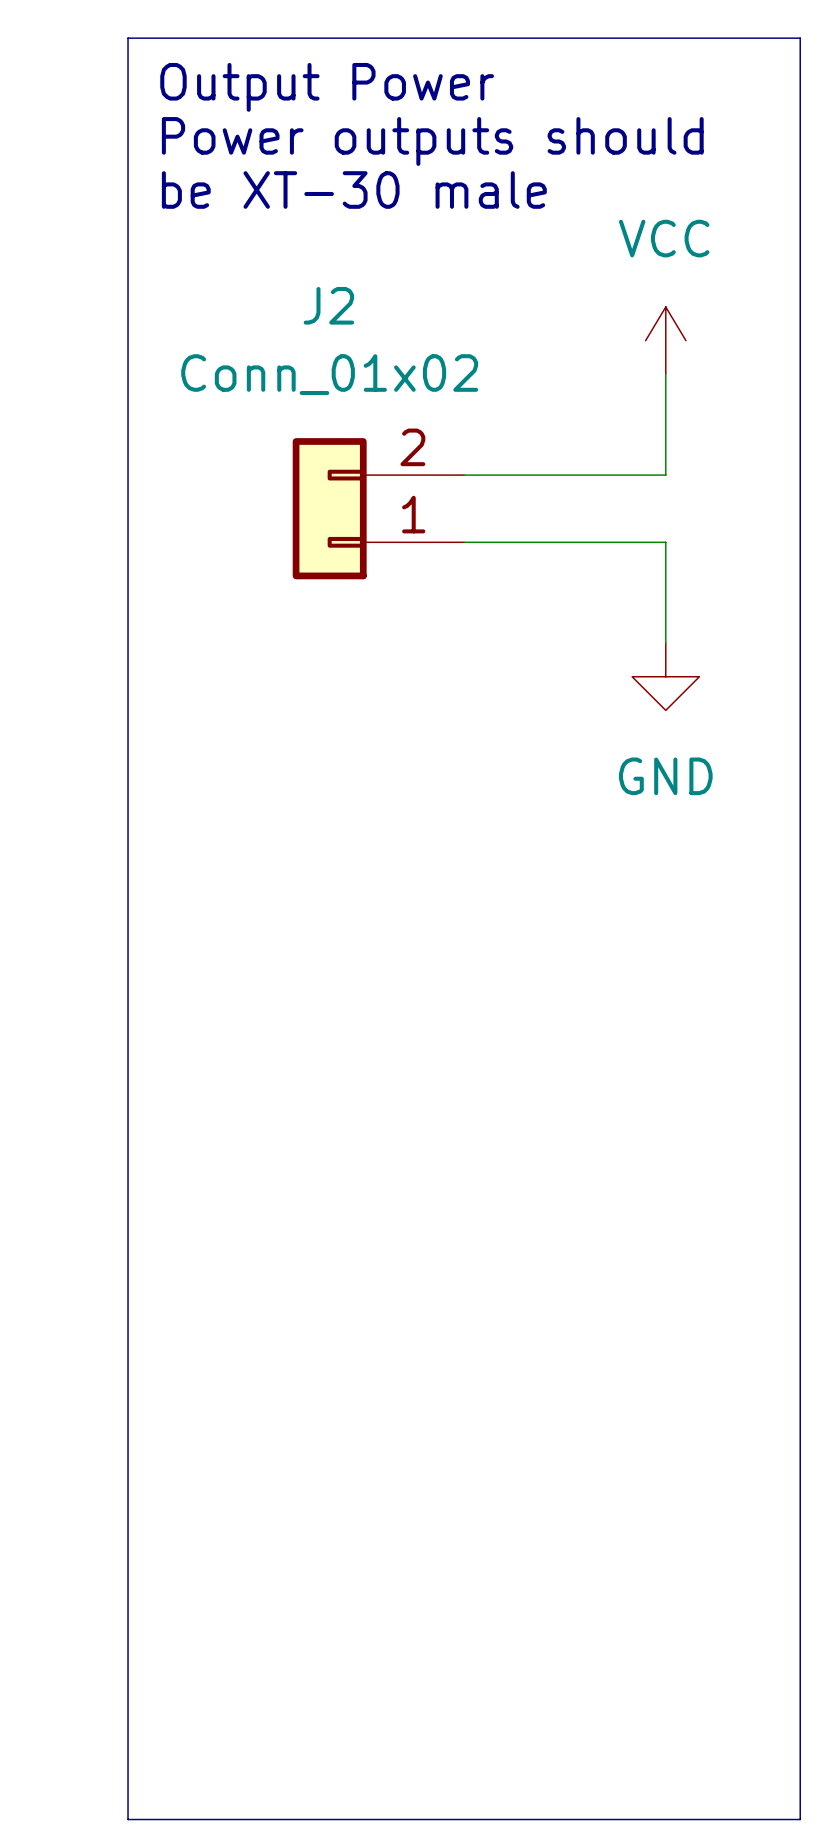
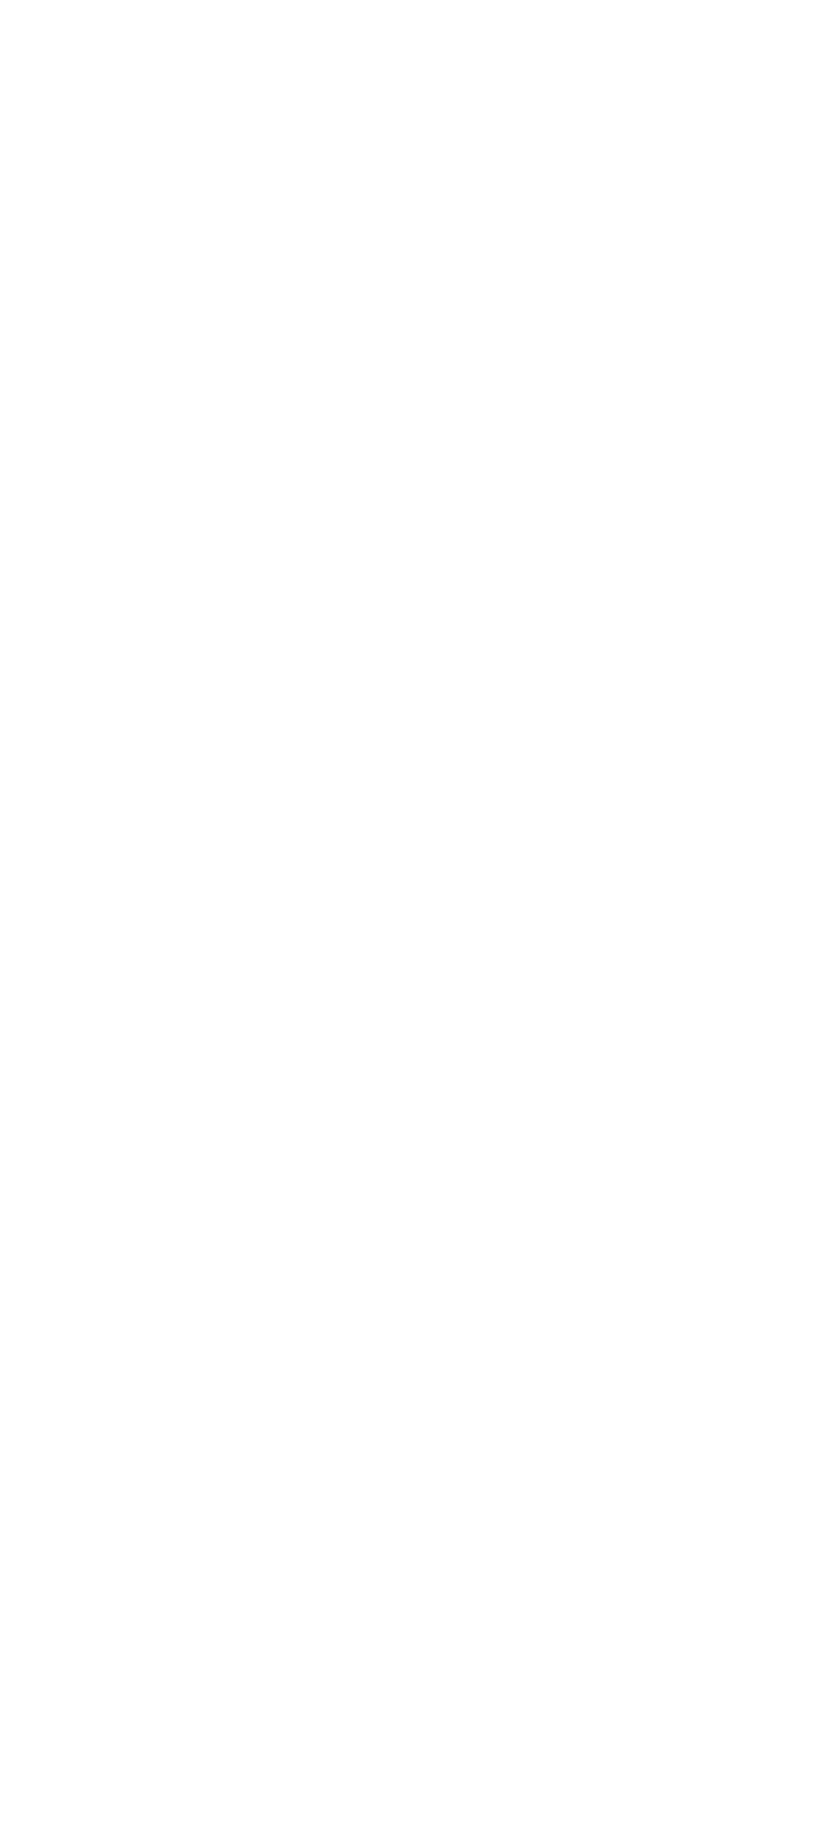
line: (128, 38) (800, 38) (800, 1819) (128, 1819) (128, 38) -> none
text: Output Power (327, 87) -> none
text: Power outputs should (432, 141) -> none
text: be XT-30 male (354, 189) -> none
power symbol: VCC (665, 340) -> none
wire: (665, 374) (665, 475) (464, 475) -> none
J2: Conn_01x02 (378, 508) -> none
wire: (464, 542) (665, 542) (665, 643) -> none
power symbol: GND (665, 676) -> none

